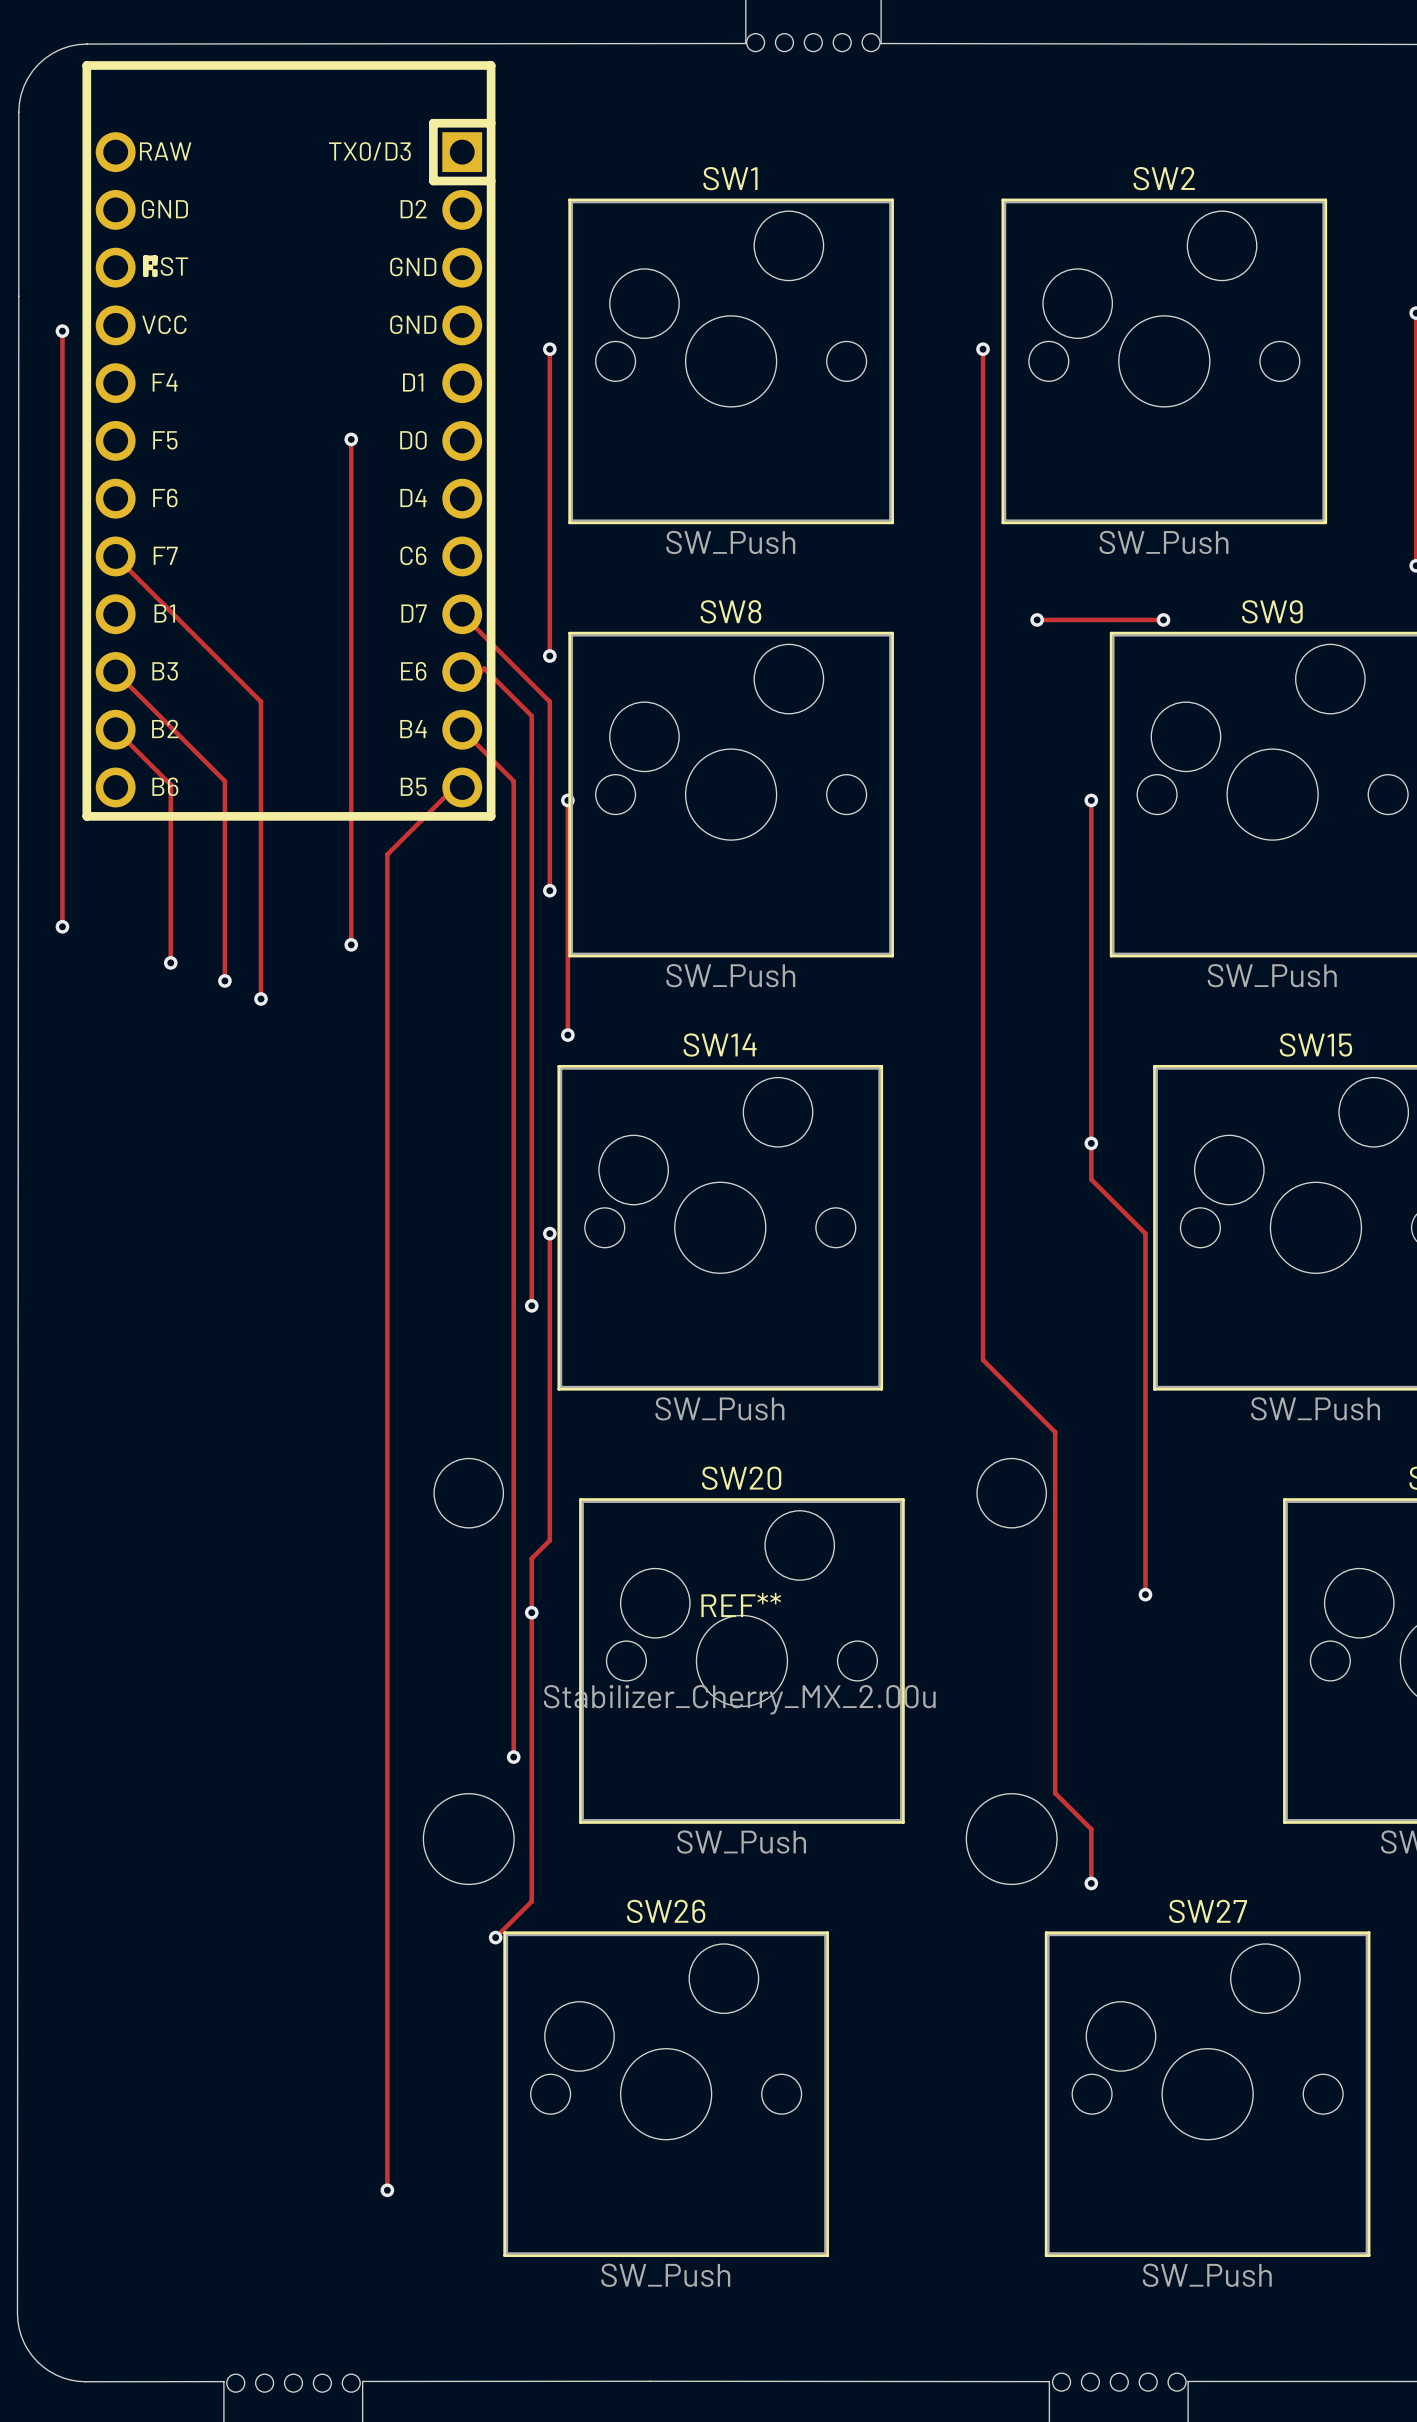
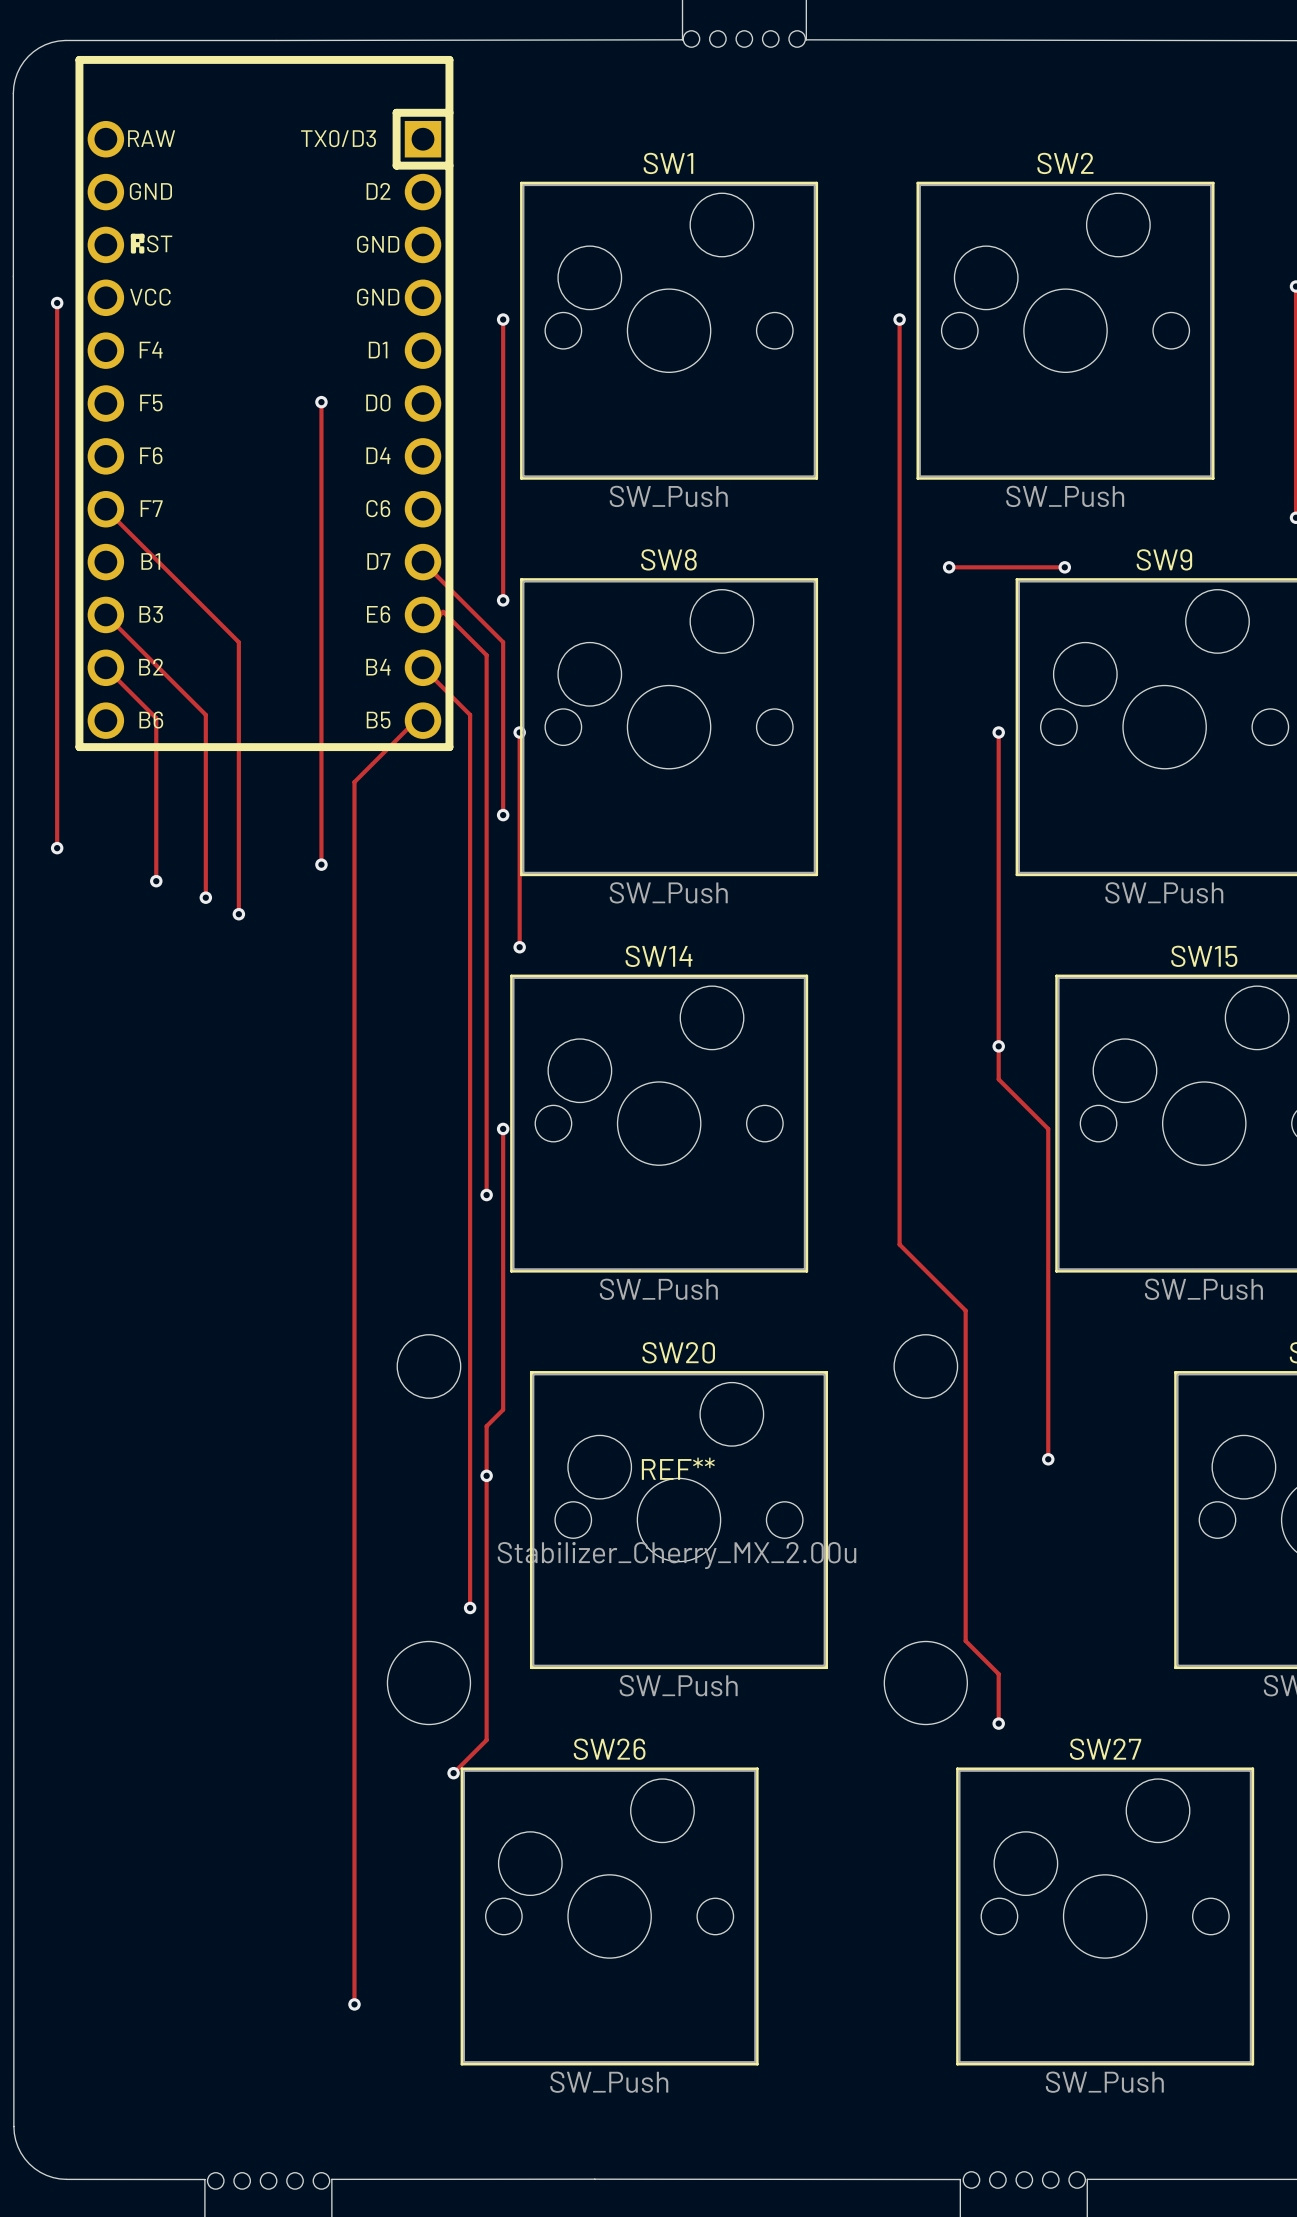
board edge: (745, 43) (78, 44) (60, 49) (45, 58) (32, 70) (21, 94) (18, 112) (17, 2321) (24, 2343) (32, 2356) (49, 2371) (63, 2377) (85, 2381) (223, 2381) -> (13, 93) (14, 2133) (17, 2146) (24, 2158) (40, 2172) (53, 2177) (66, 2179) (204, 2179)
board edge: none -> (682, 39) (65, 40) (45, 44) (28, 56) (17, 73) (13, 93)

